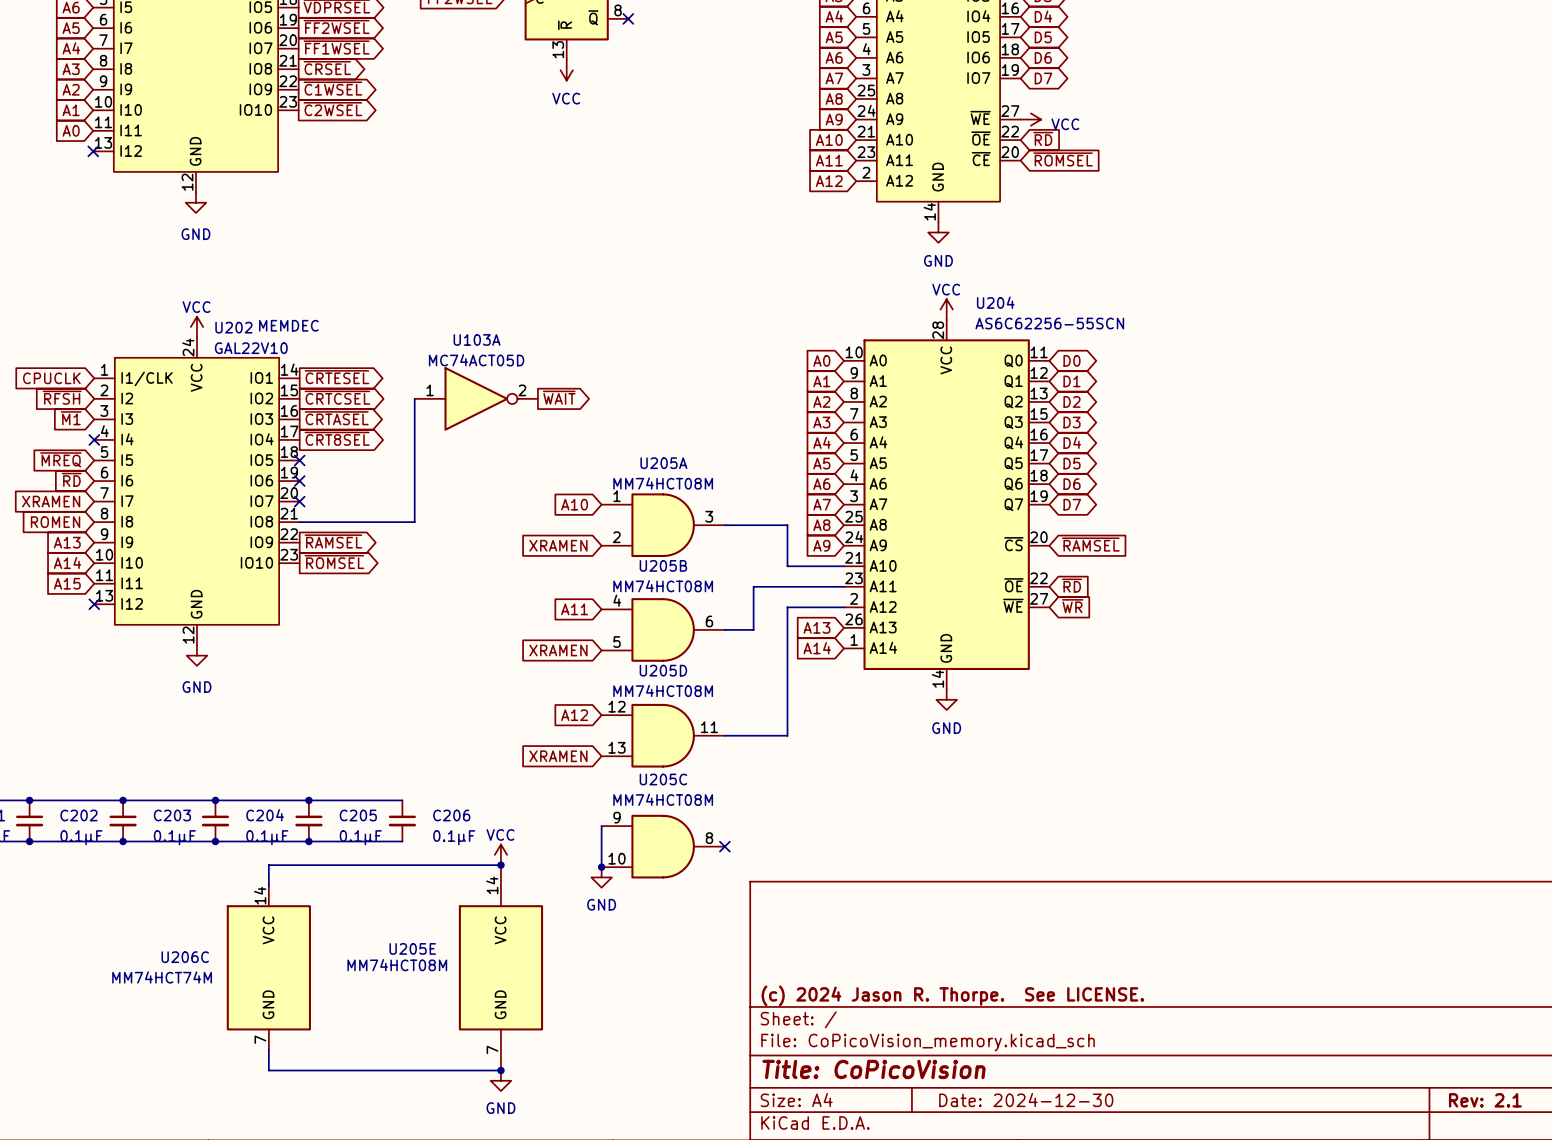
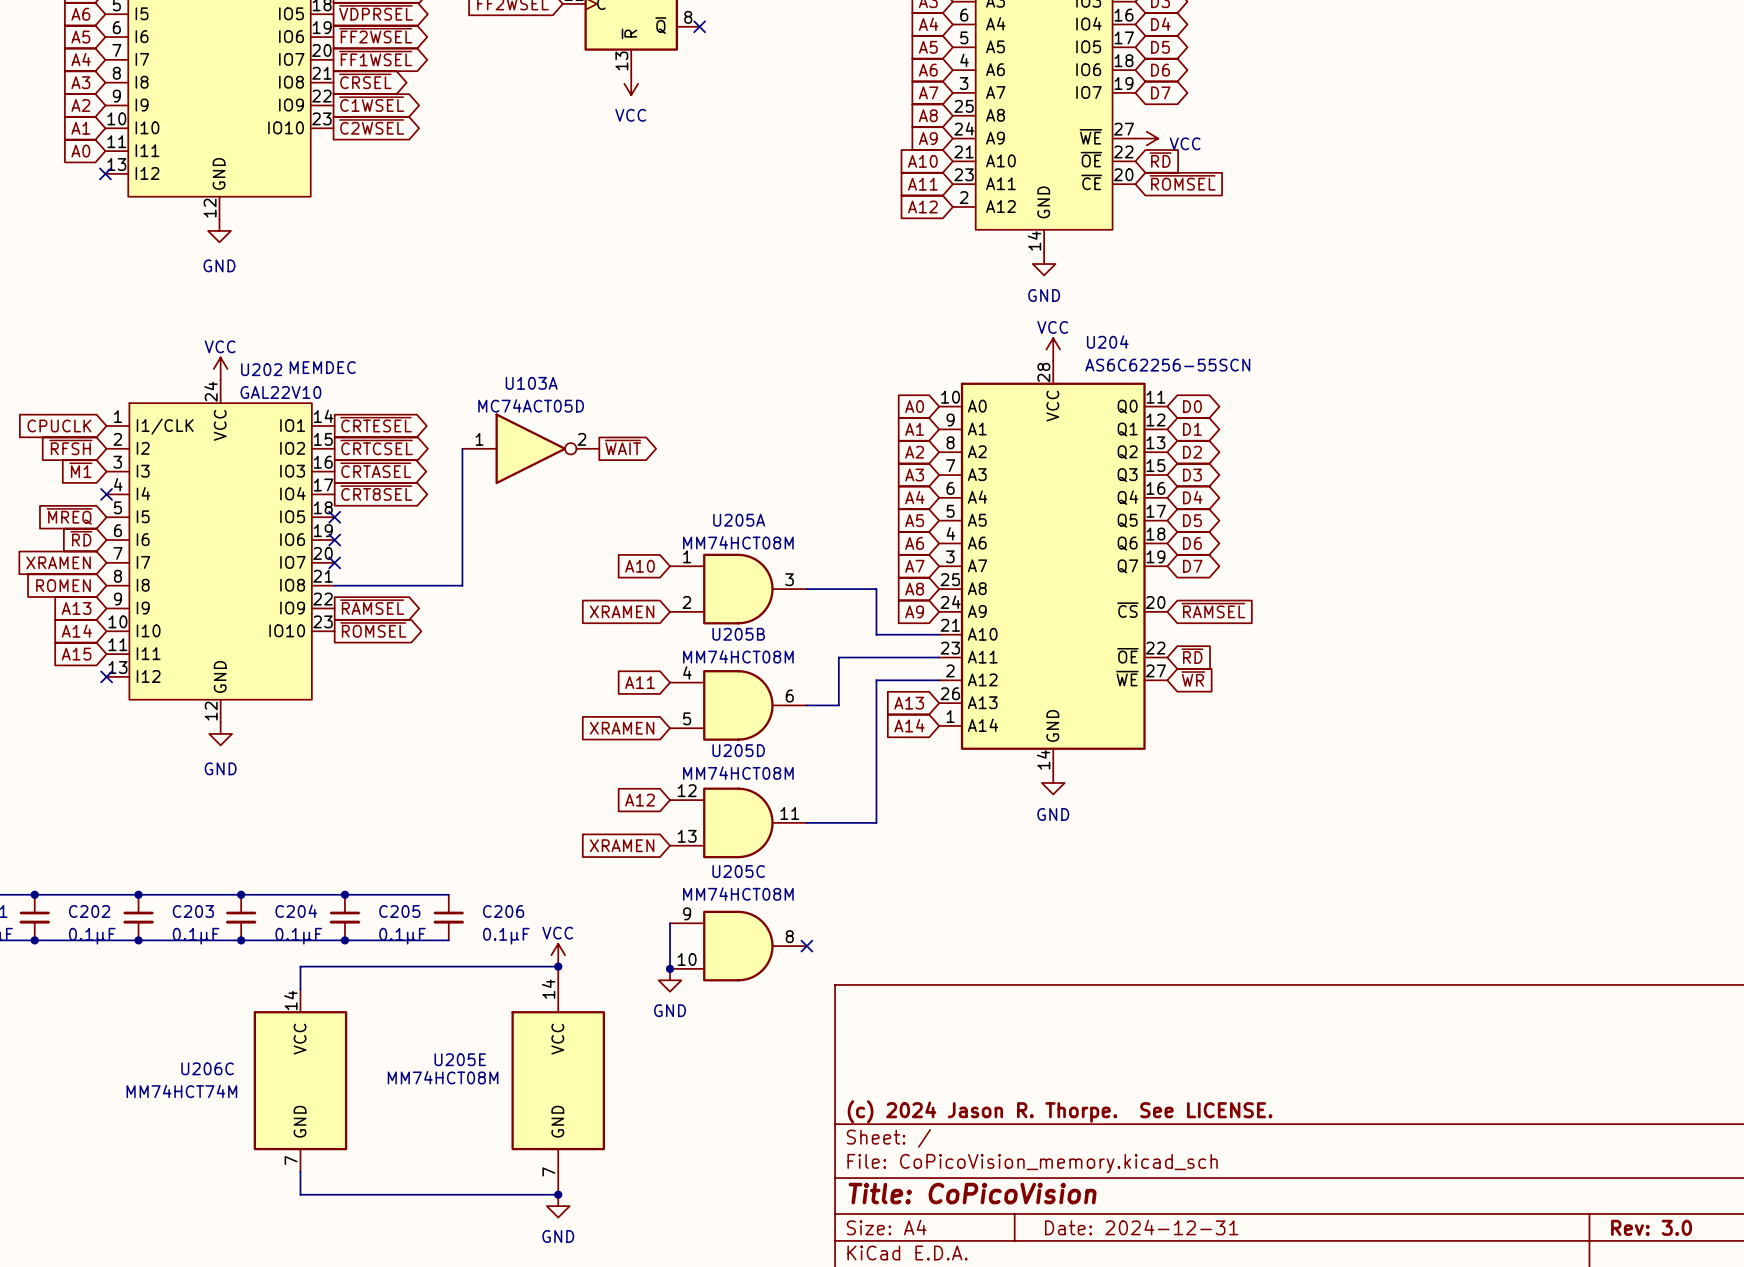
title block: Date: 2024-12-30 (1026, 1100) -> Date: 2024-12-31 (1141, 1227)
title block: Rev: 2.1 (1485, 1100) -> Rev: 3.0 (1651, 1227)

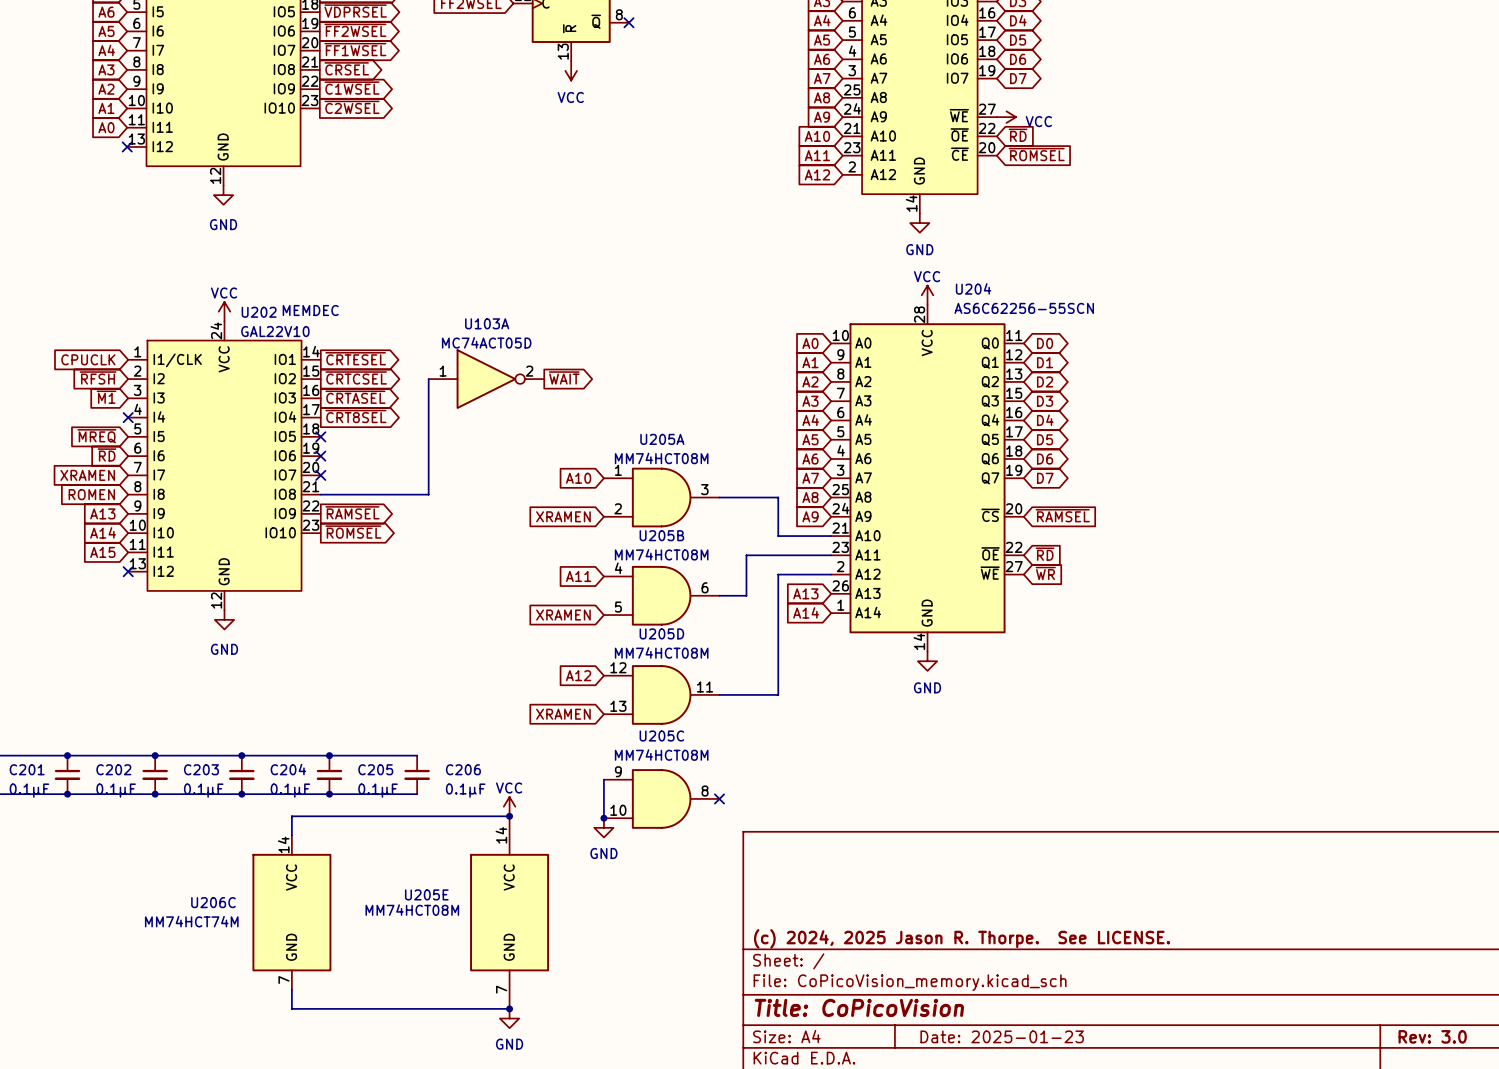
title block: (c) 2024 Jason R. Thorpe. See LICENSE. (1060, 1111) -> (c) 2024, 2025 Jason R. Thorpe. See LICENSE. (961, 938)
title block: Date: 2024-12-31 (1141, 1227) -> Date: 2025-01-23 (1002, 1036)

